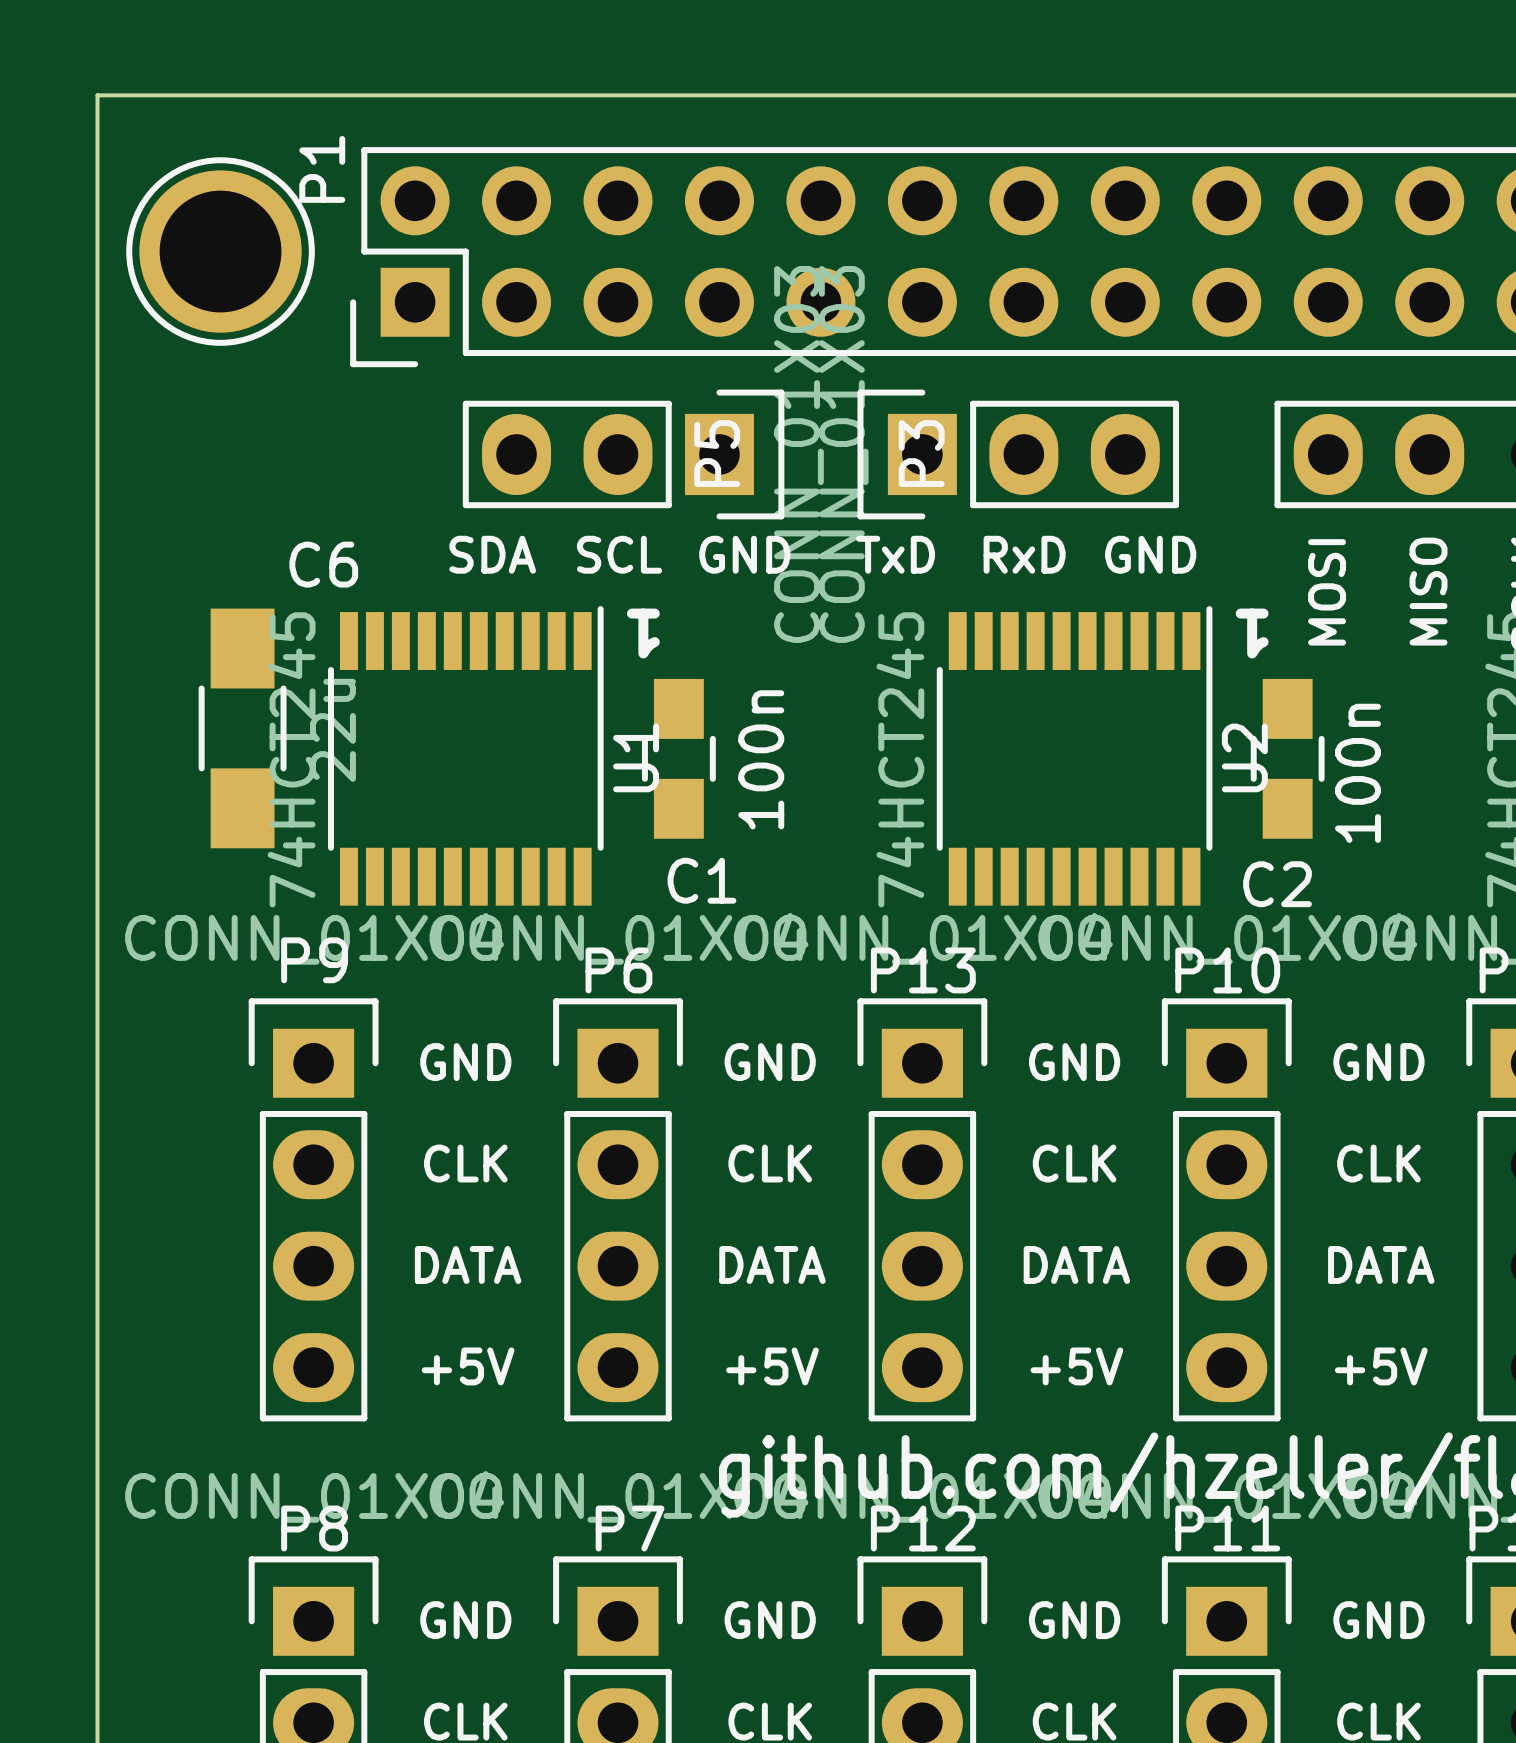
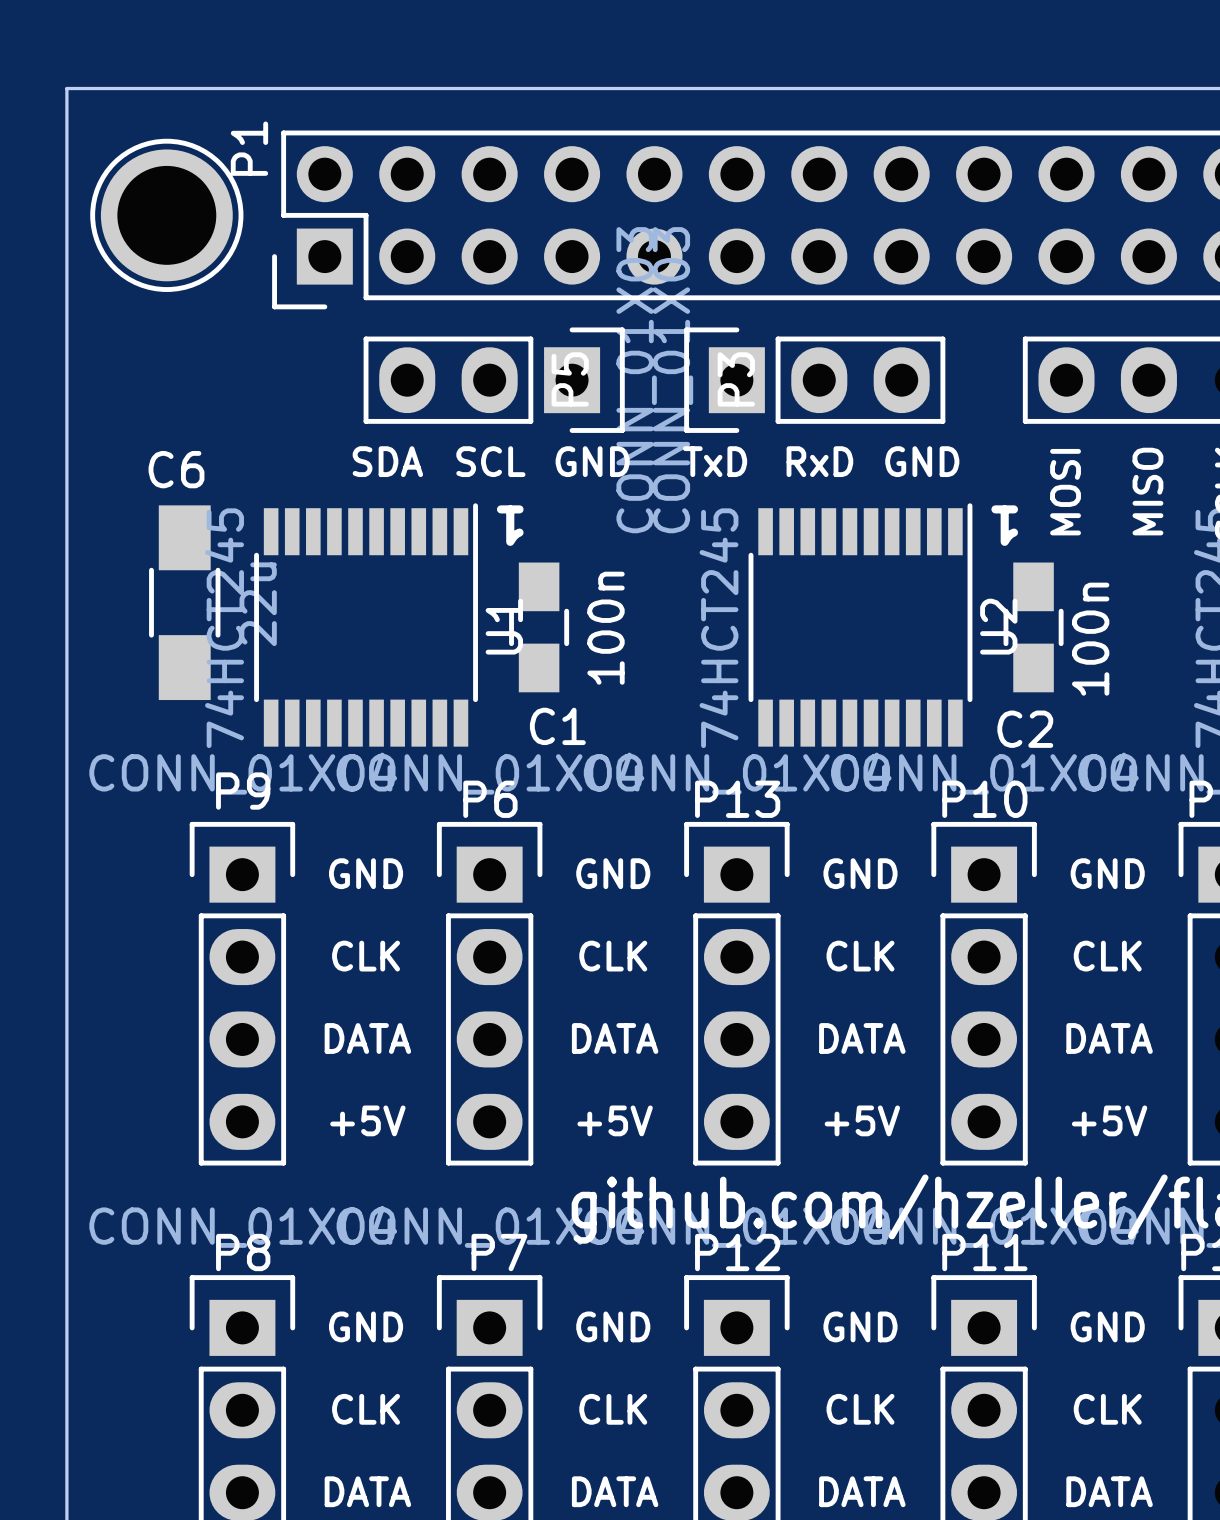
C6 name position: C6 (323, 564) -> C6 (176, 469)

